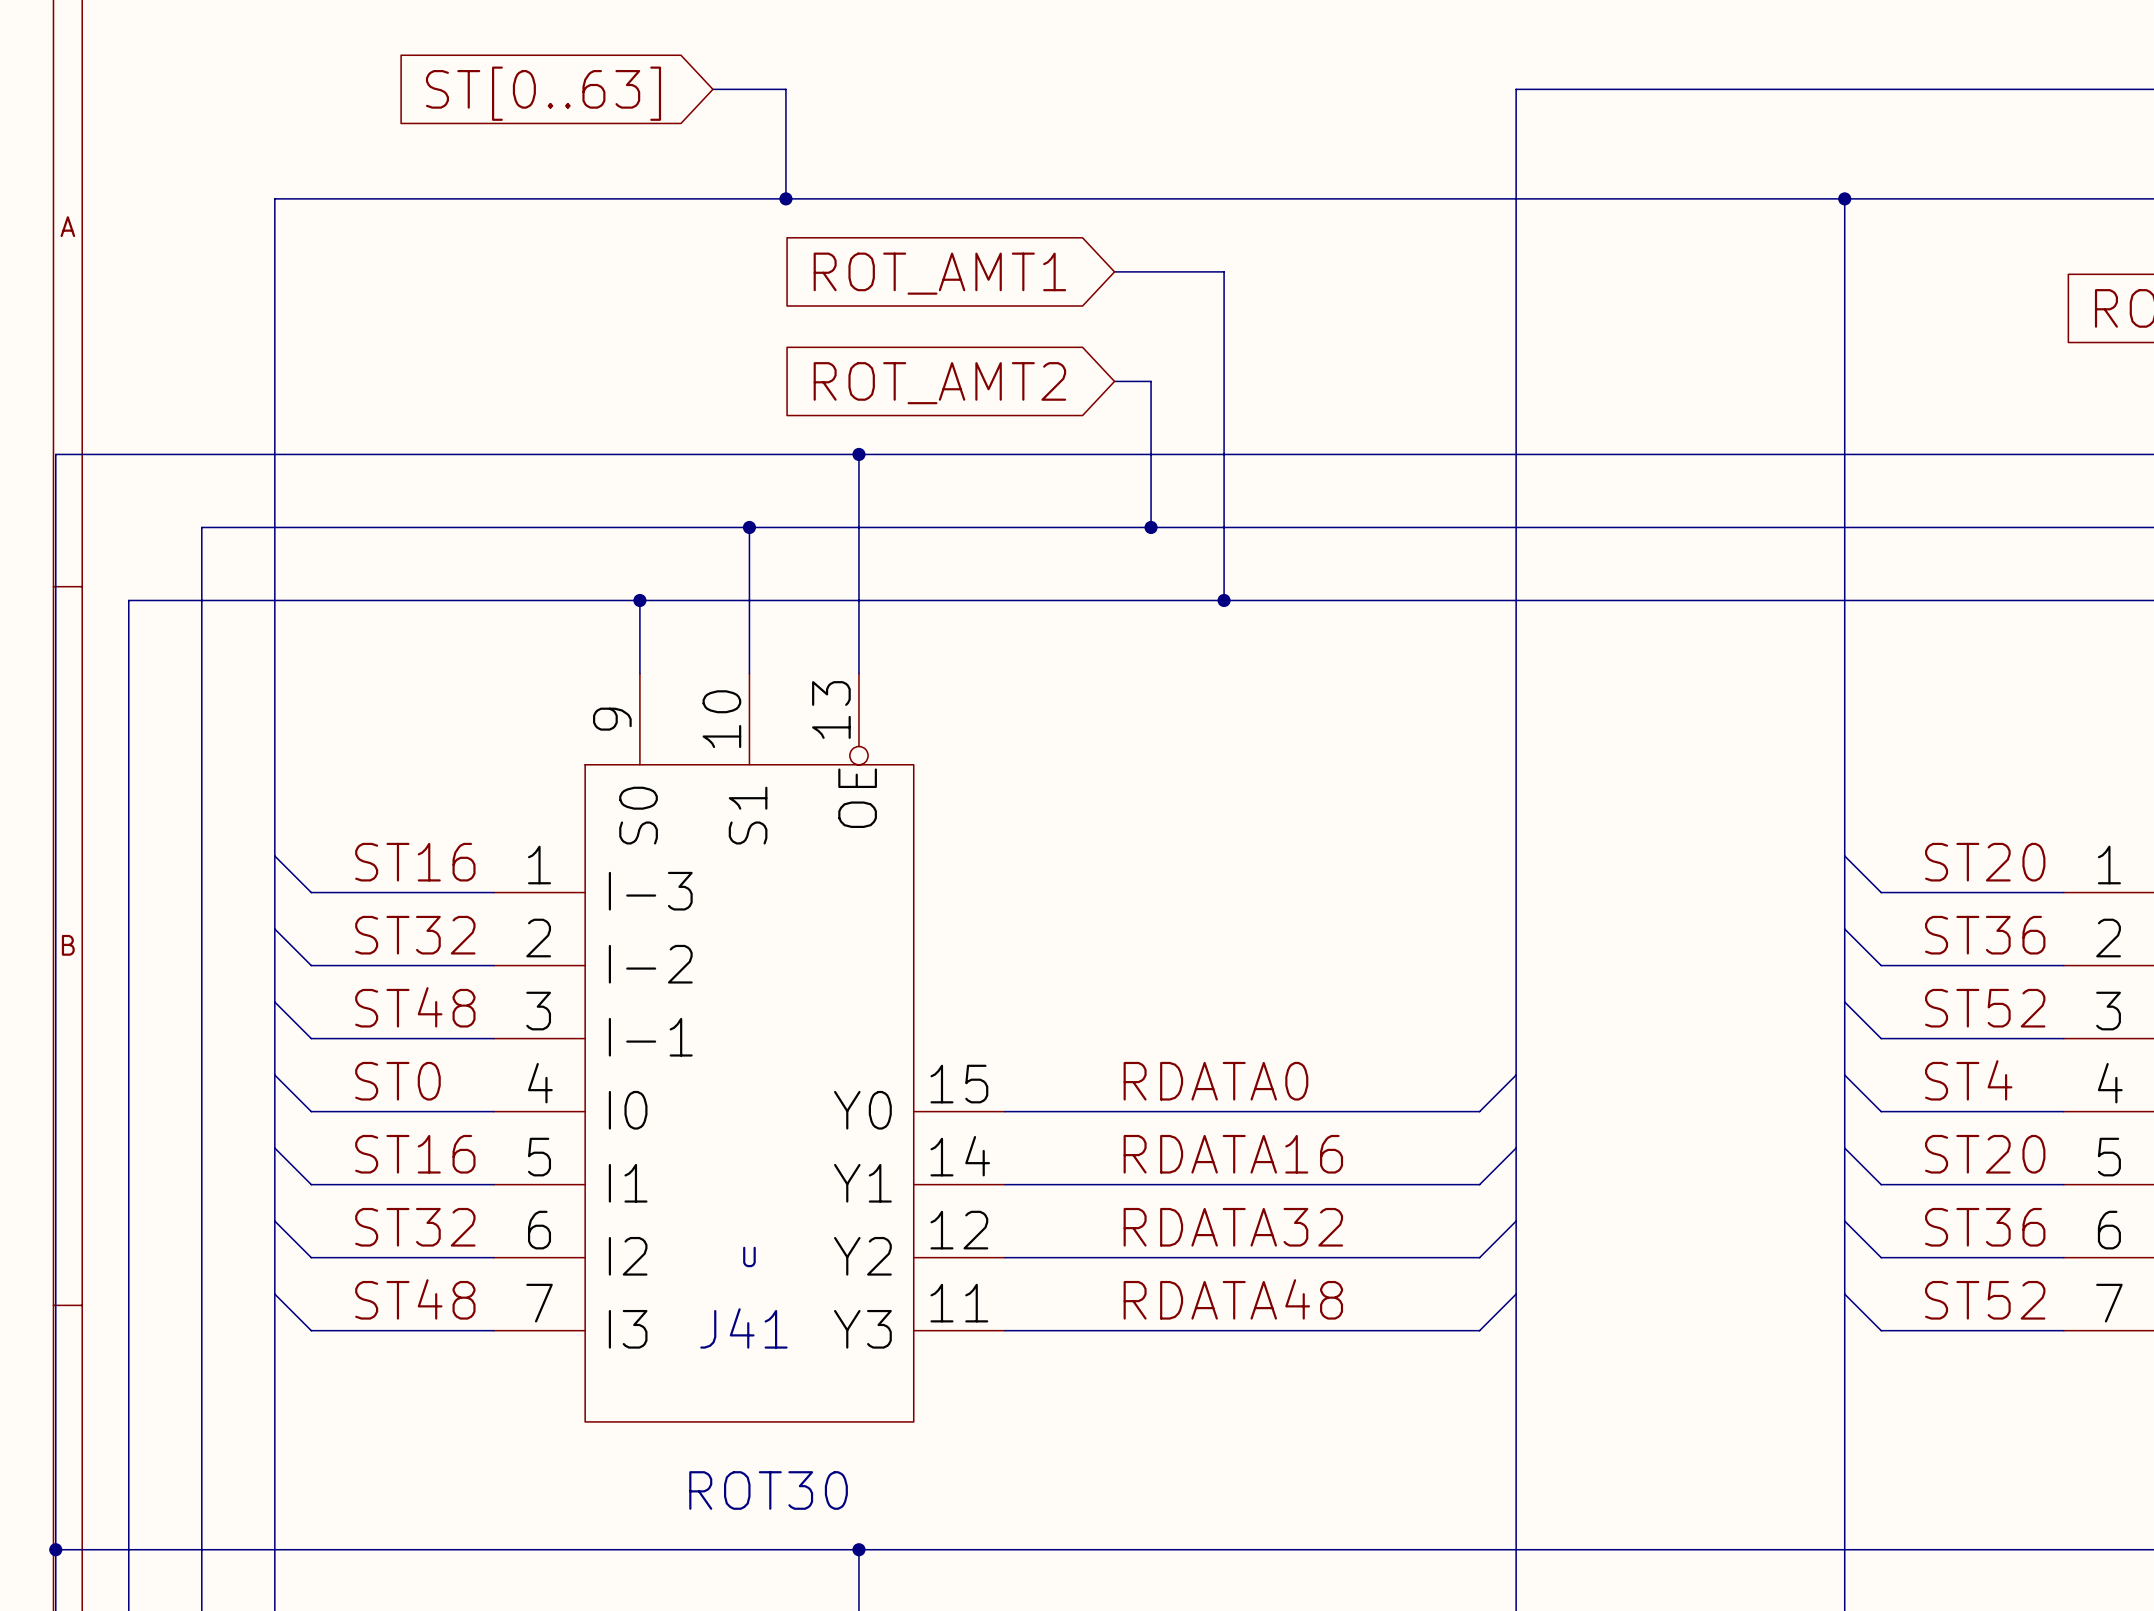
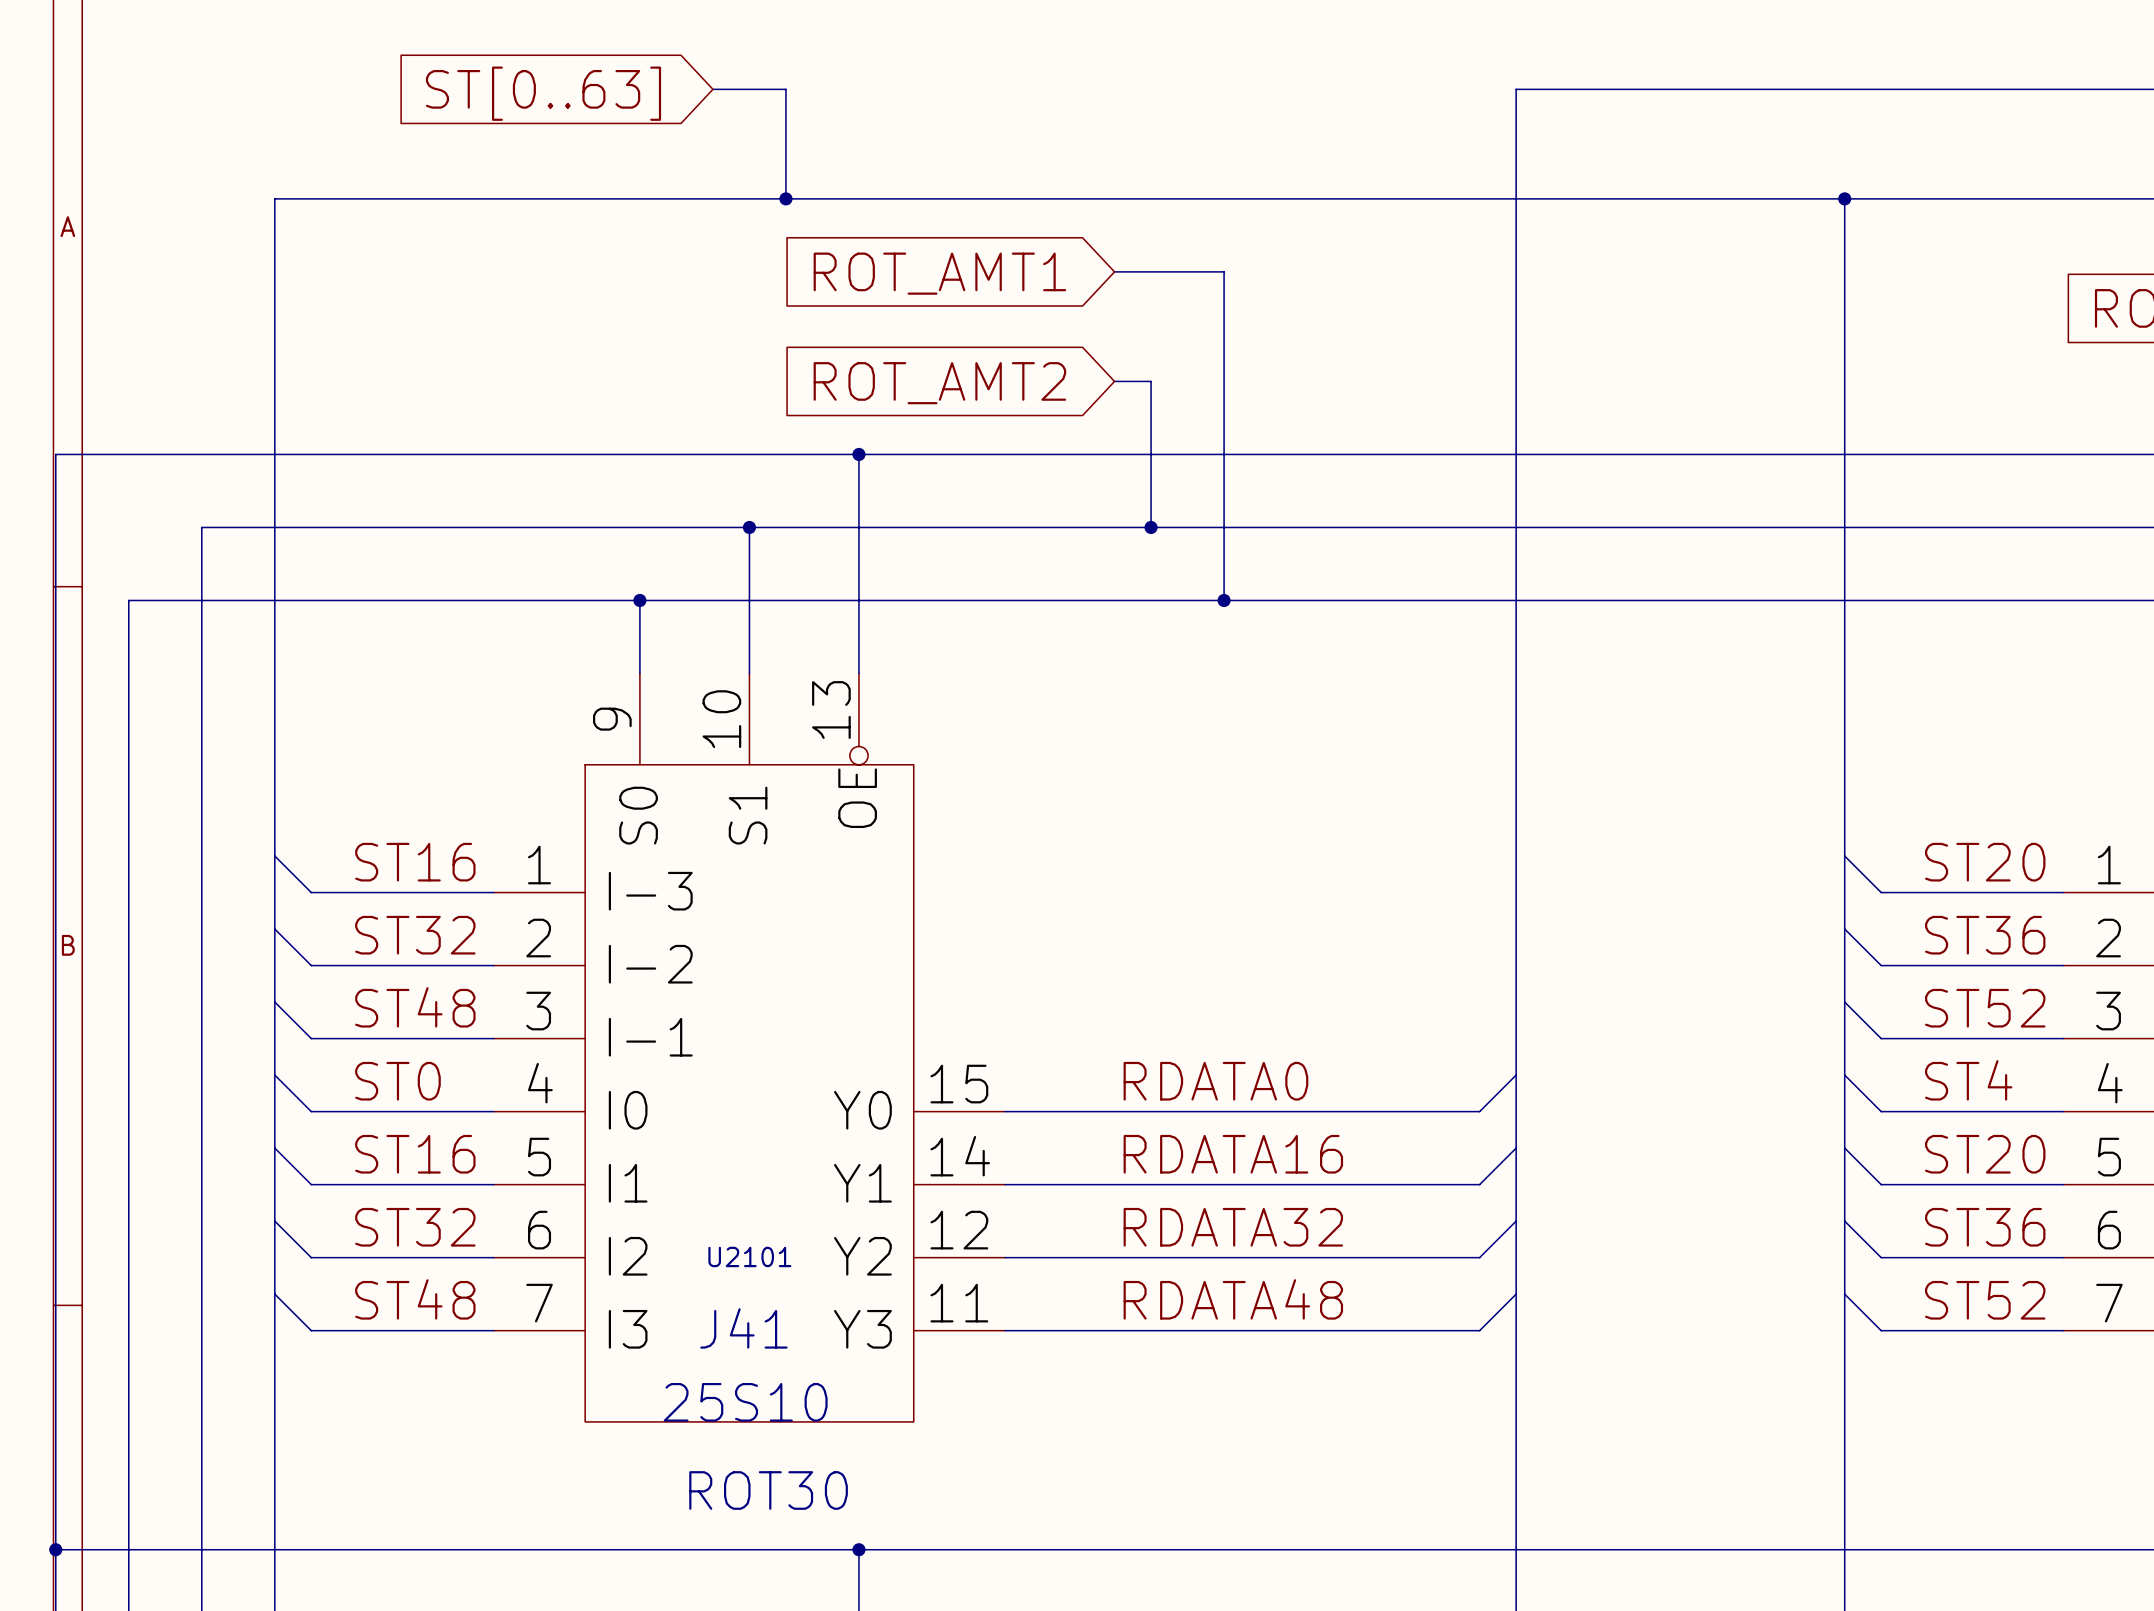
U name: U (749, 1256) -> U2101 (749, 1256)
U value: none -> 25S10 (745, 1402)

